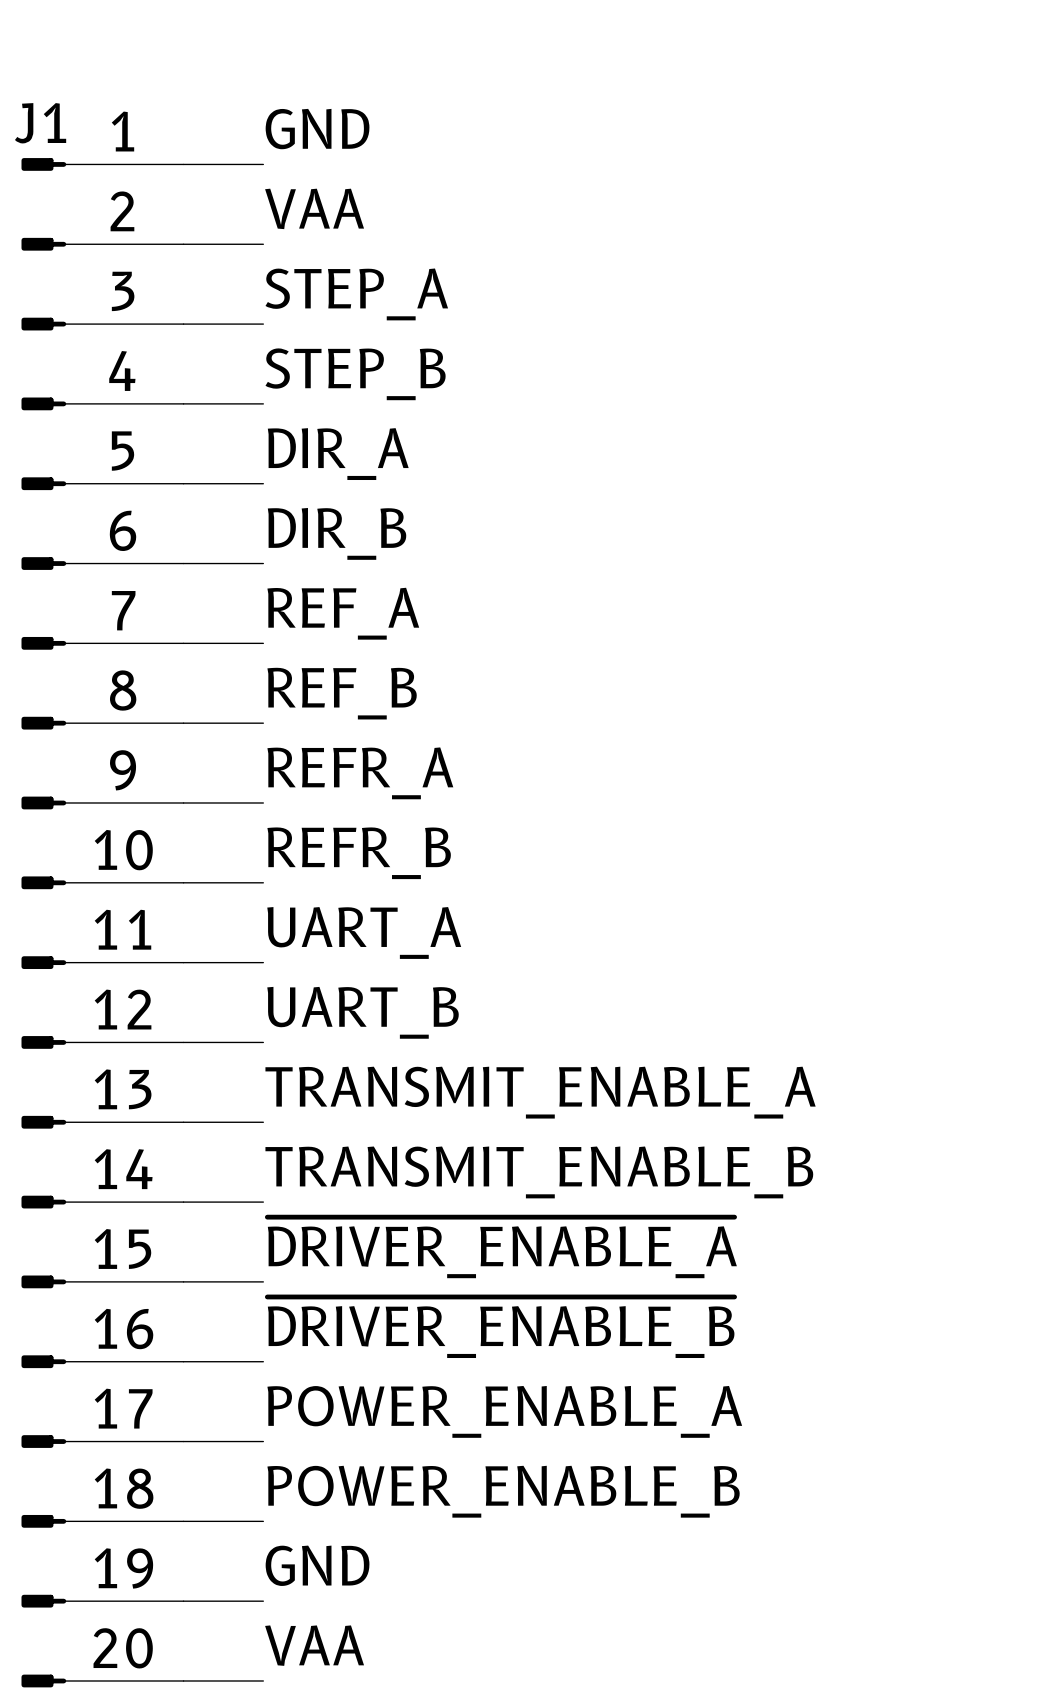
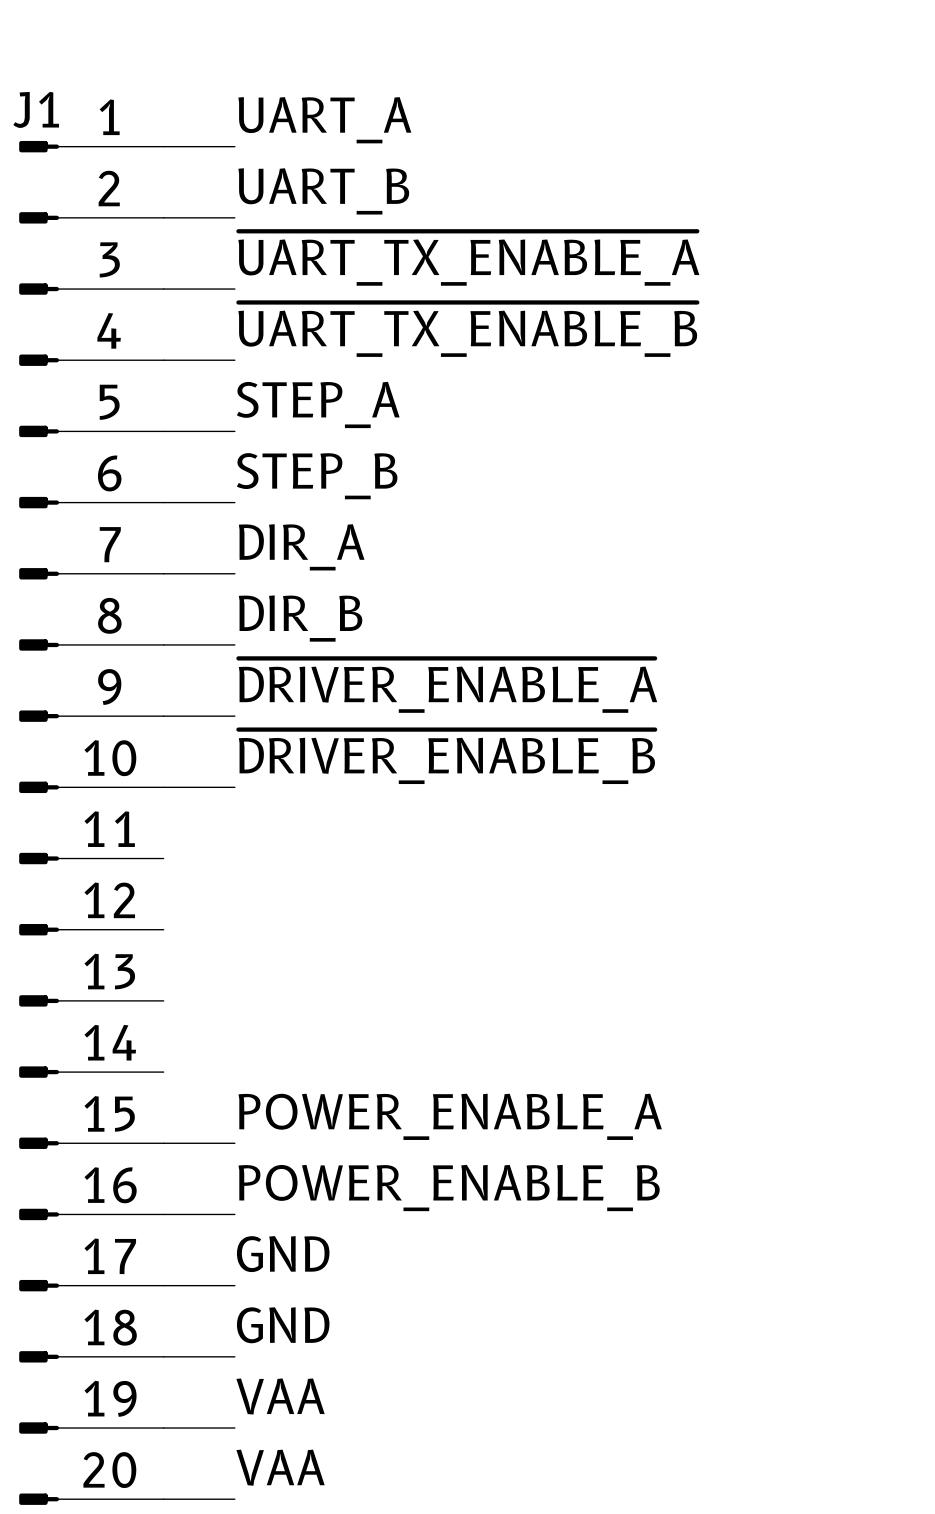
label: GND (317, 129) -> UART_A (324, 120)
label: VAA (314, 208) -> UART_B (323, 191)
label: STEP_A (356, 294) -> ~{UART_TX_ENABLE_A} (468, 258)
label: STEP_B (355, 374) -> ~{UART_TX_ENABLE_B} (467, 329)
label: DIR_A (338, 454) -> STEP_A (318, 404)
label: DIR_B (337, 533) -> STEP_B (317, 476)
label: REF_A (343, 613) -> DIR_A (301, 547)
label: REF_B (342, 693) -> DIR_B (300, 618)
label: REFR_A (360, 773) -> ~{DRIVER_ENABLE_A} (447, 685)
label: REFR_B (359, 853) -> ~{DRIVER_ENABLE_B} (446, 756)
label: UART_A (364, 932) -> none
wire: (183, 962) (263, 962) -> none
label: UART_B (363, 1012) -> none
wire: (183, 1042) (263, 1042) -> none
label: TRANSMIT_ENABLE_A (540, 1092) -> none
wire: (183, 1122) (263, 1122) -> none
label: TRANSMIT_ENABLE_B (539, 1172) -> none
wire: (183, 1202) (263, 1202) -> none
label: ~{DRIVER_ENABLE_A} (502, 1247) -> POWER_ENABLE_A (450, 1116)
label: ~{DRIVER_ENABLE_B} (500, 1327) -> POWER_ENABLE_B (449, 1188)
label: POWER_ENABLE_A (504, 1411) -> GND (283, 1254)
label: POWER_ENABLE_B (503, 1491) -> GND (283, 1325)
label: GND (317, 1565) -> VAA (280, 1396)

